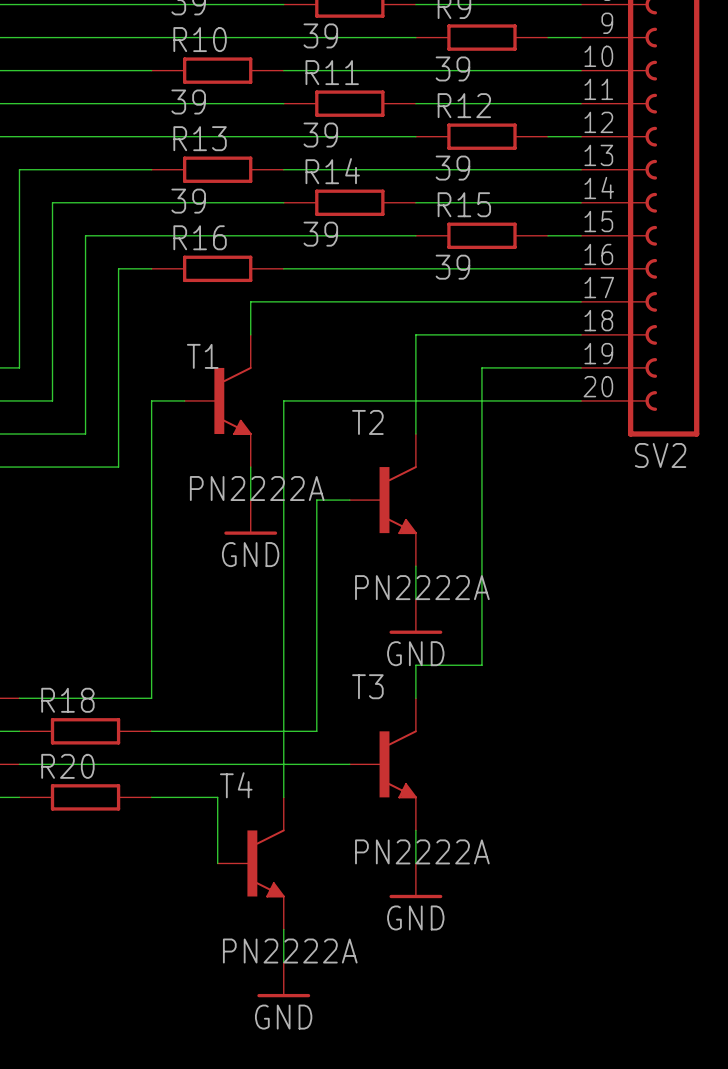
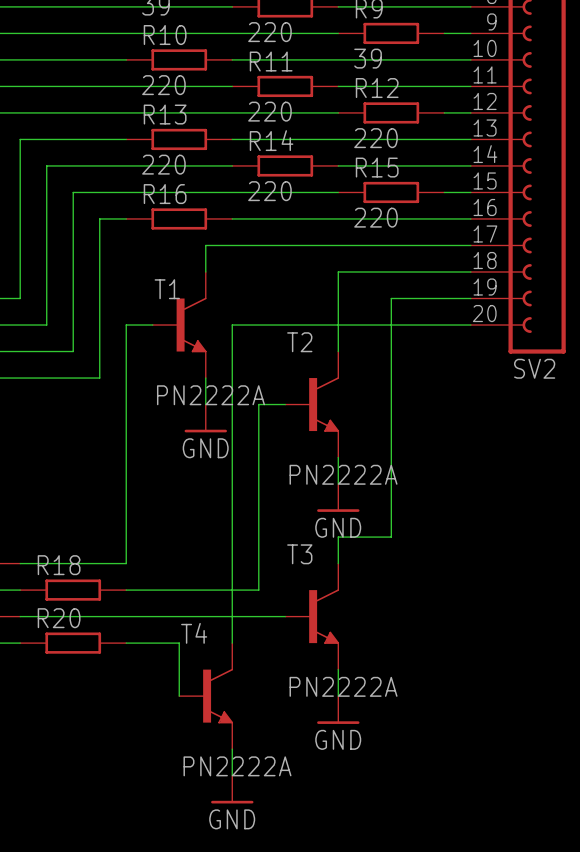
part value: 39 (320, 35) -> 220 (269, 32)
R10 value: 39 (188, 102) -> 220 (163, 85)
R11 value: 39 (320, 135) -> 220 (269, 111)
R12 value: 39 (452, 168) -> 220 (376, 138)
R13 value: 39 (188, 201) -> 220 (163, 164)
R14 value: 39 (320, 234) -> 220 (269, 191)
R15 value: 39 (452, 267) -> 220 (376, 217)

